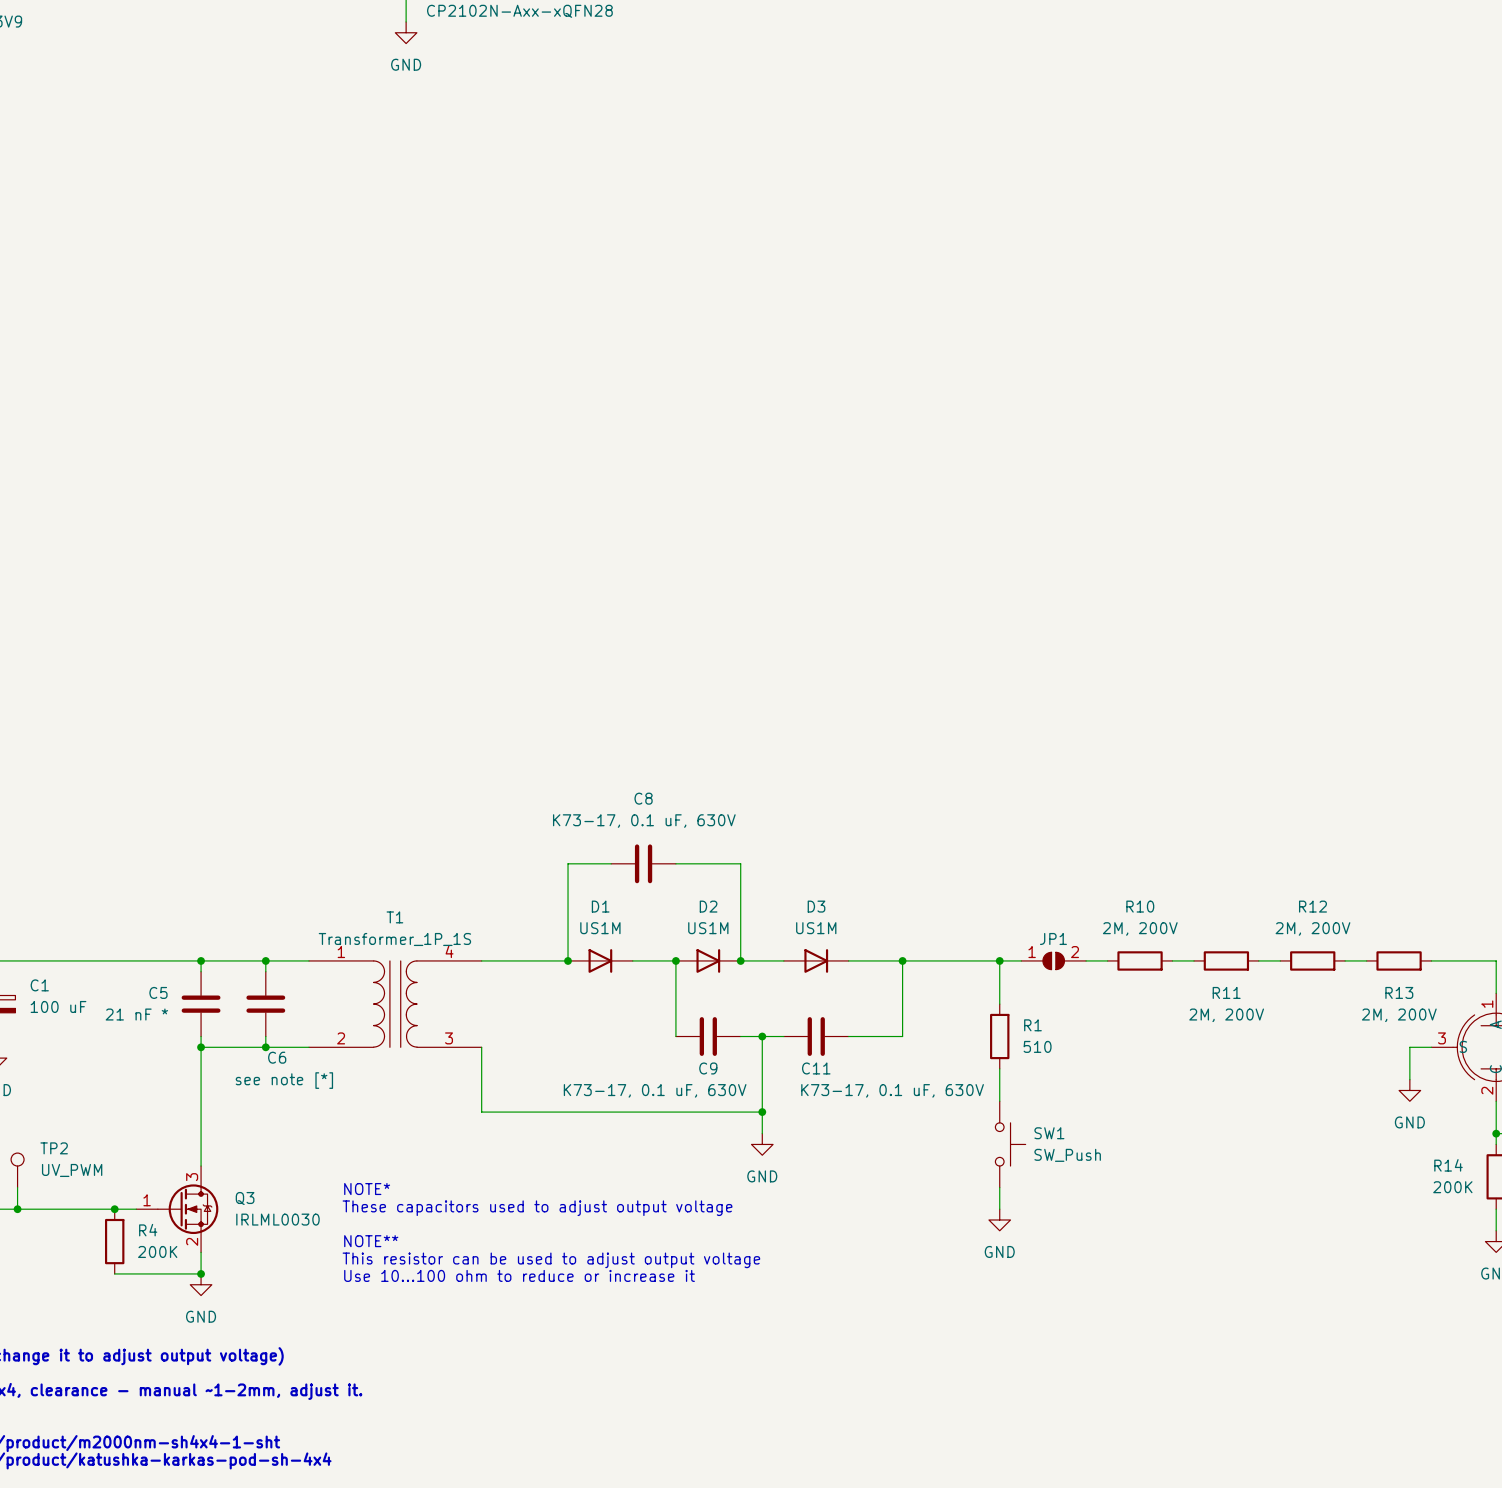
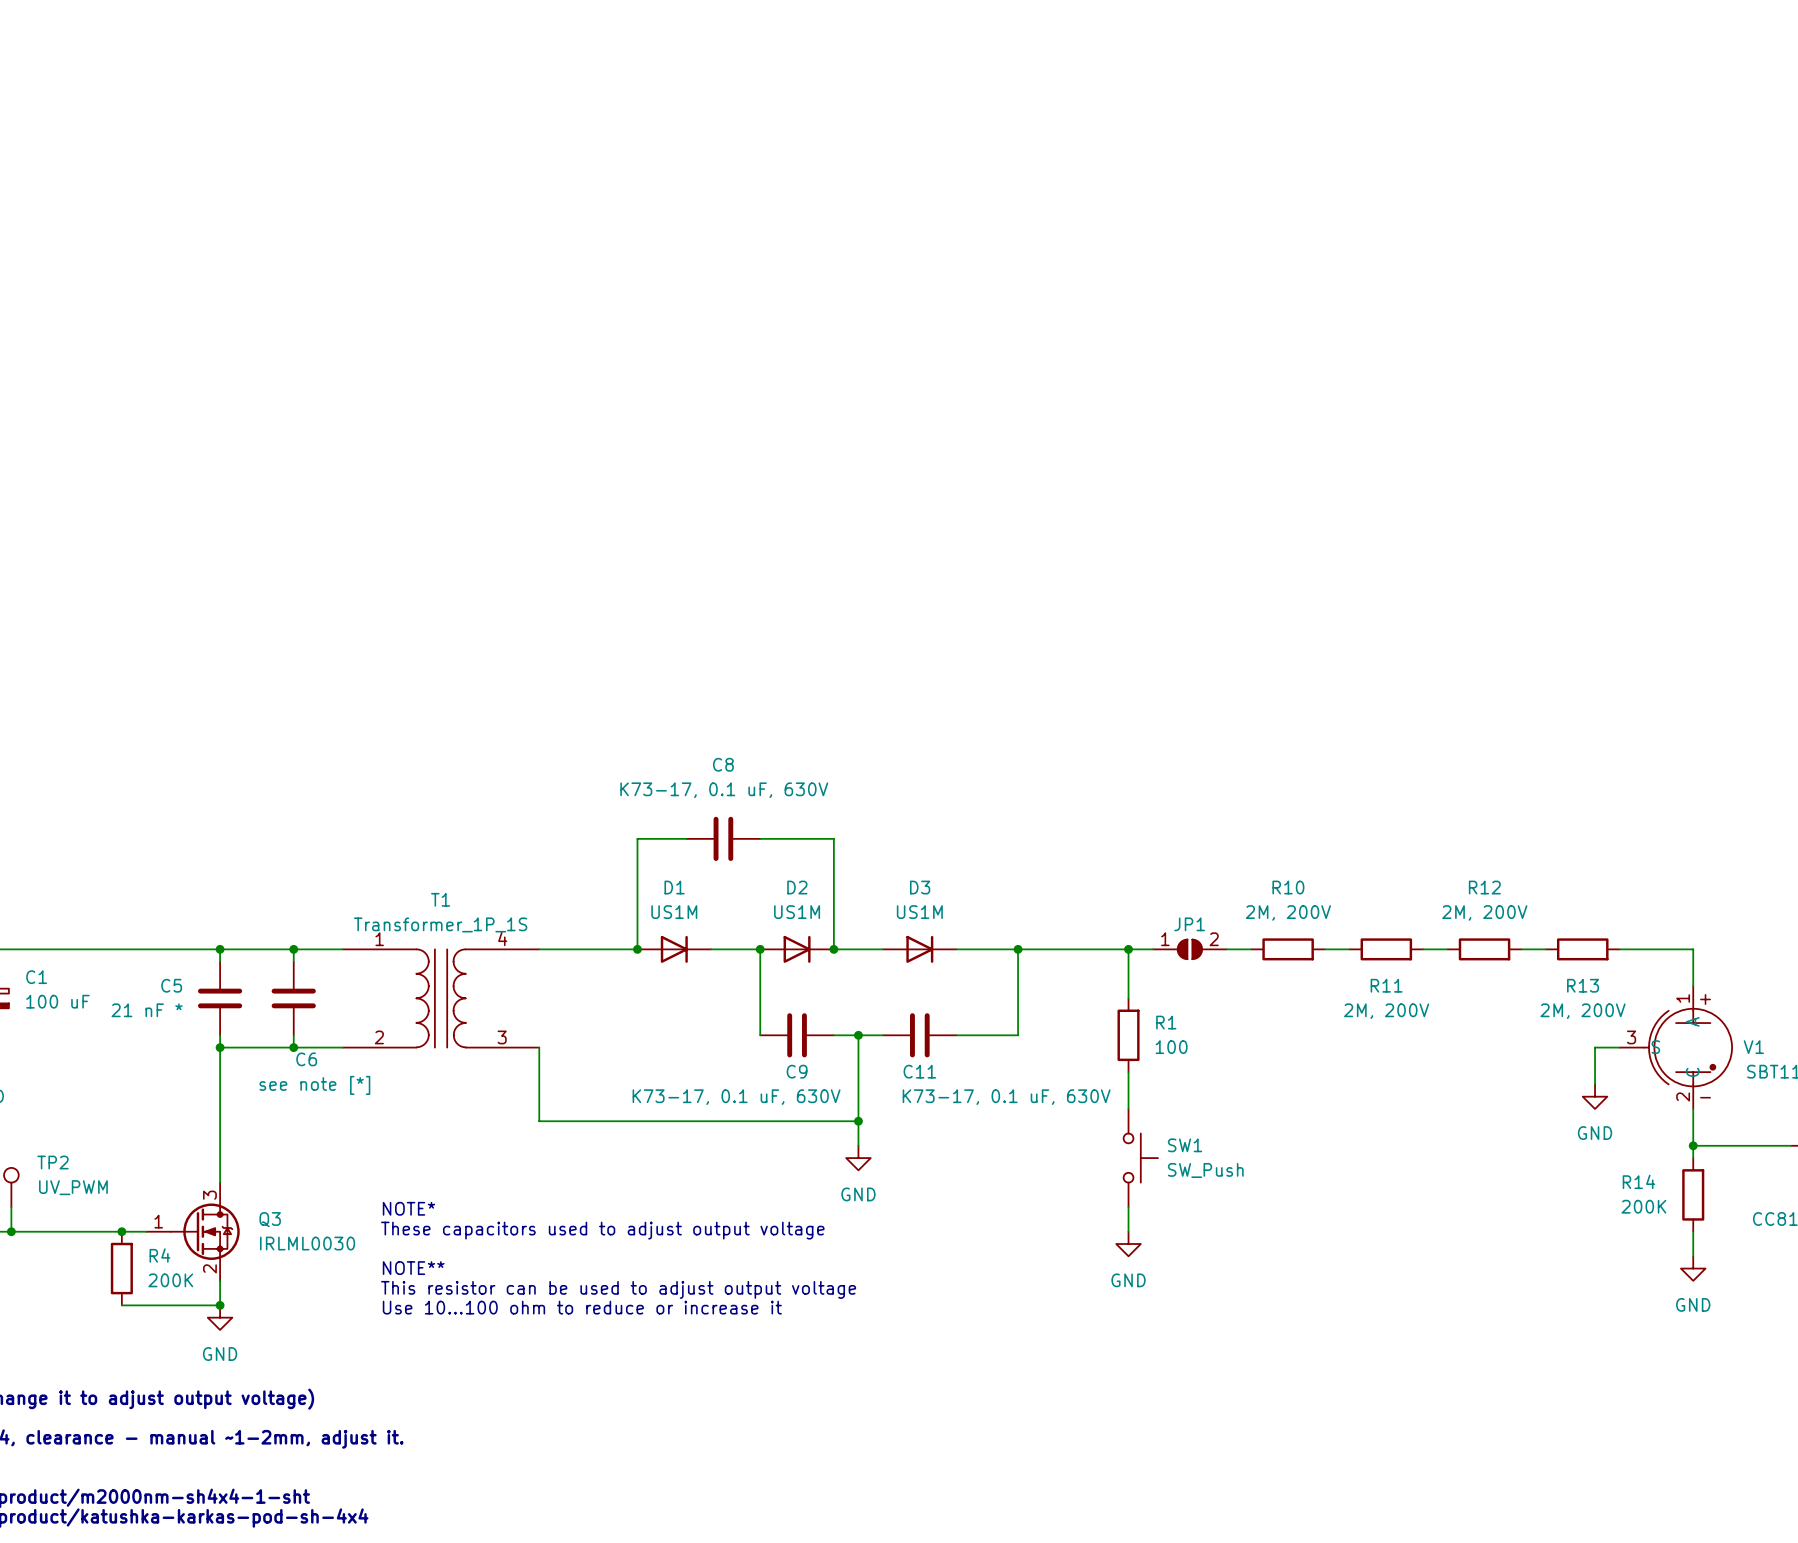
R1 value: 510 (1037, 1046) -> 100 (1171, 1047)

